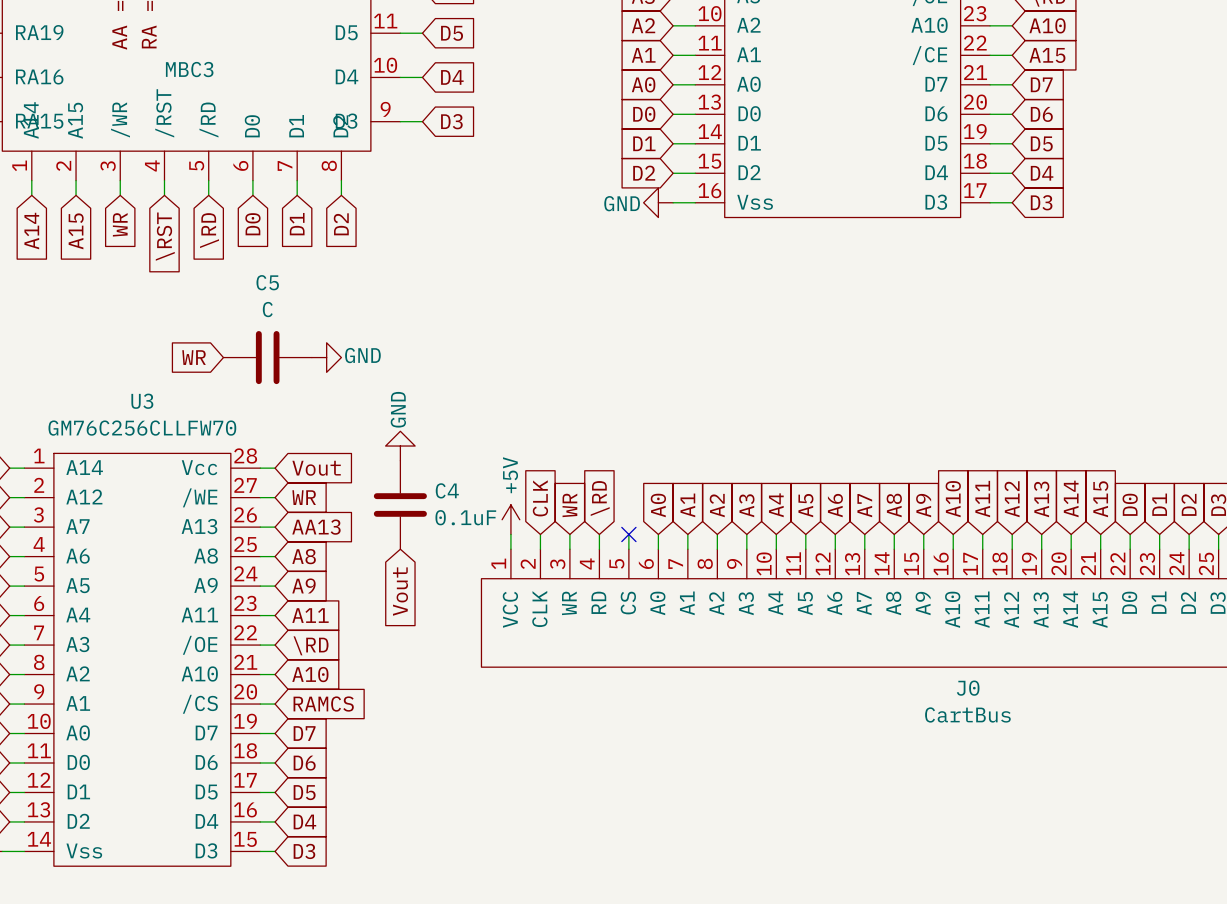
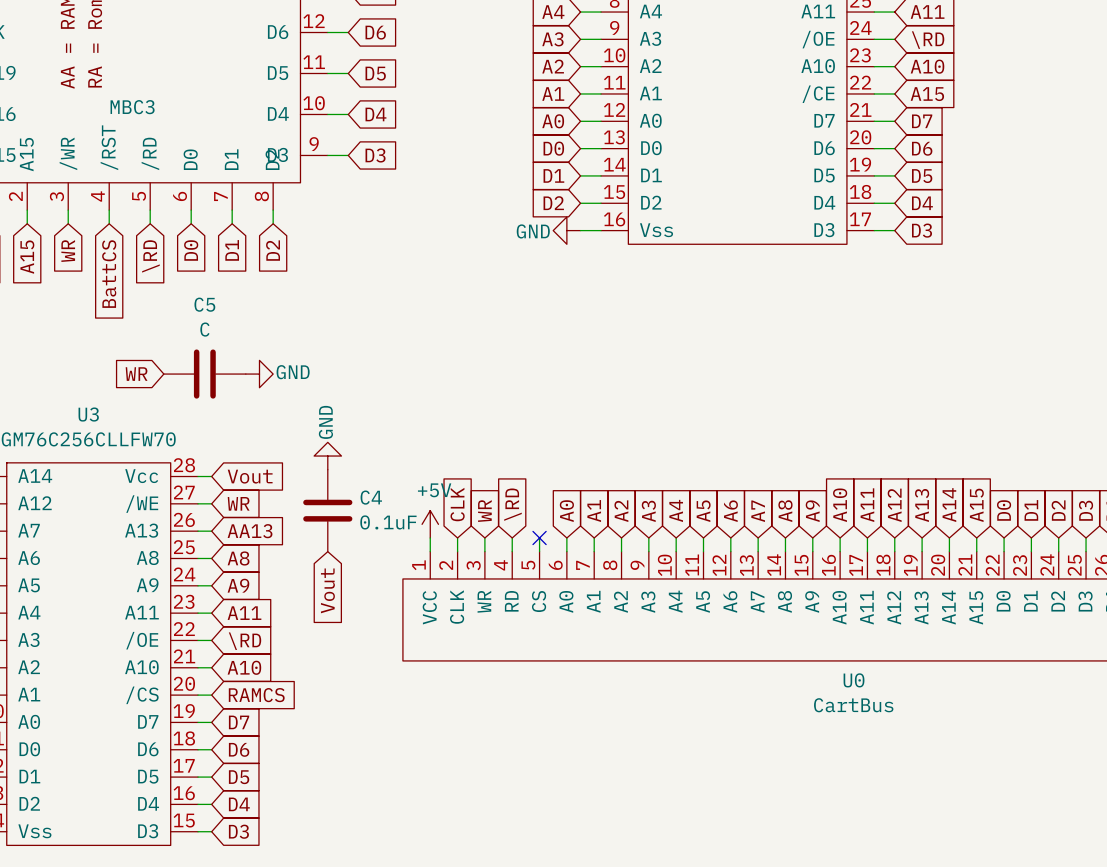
global label: \RST (165, 236) -> BattCS (109, 274)
power symbol text rotation: 0° (510, 475) -> 90° clockwise (434, 490)
J0 name: J0 (968, 688) -> U0 (854, 680)

